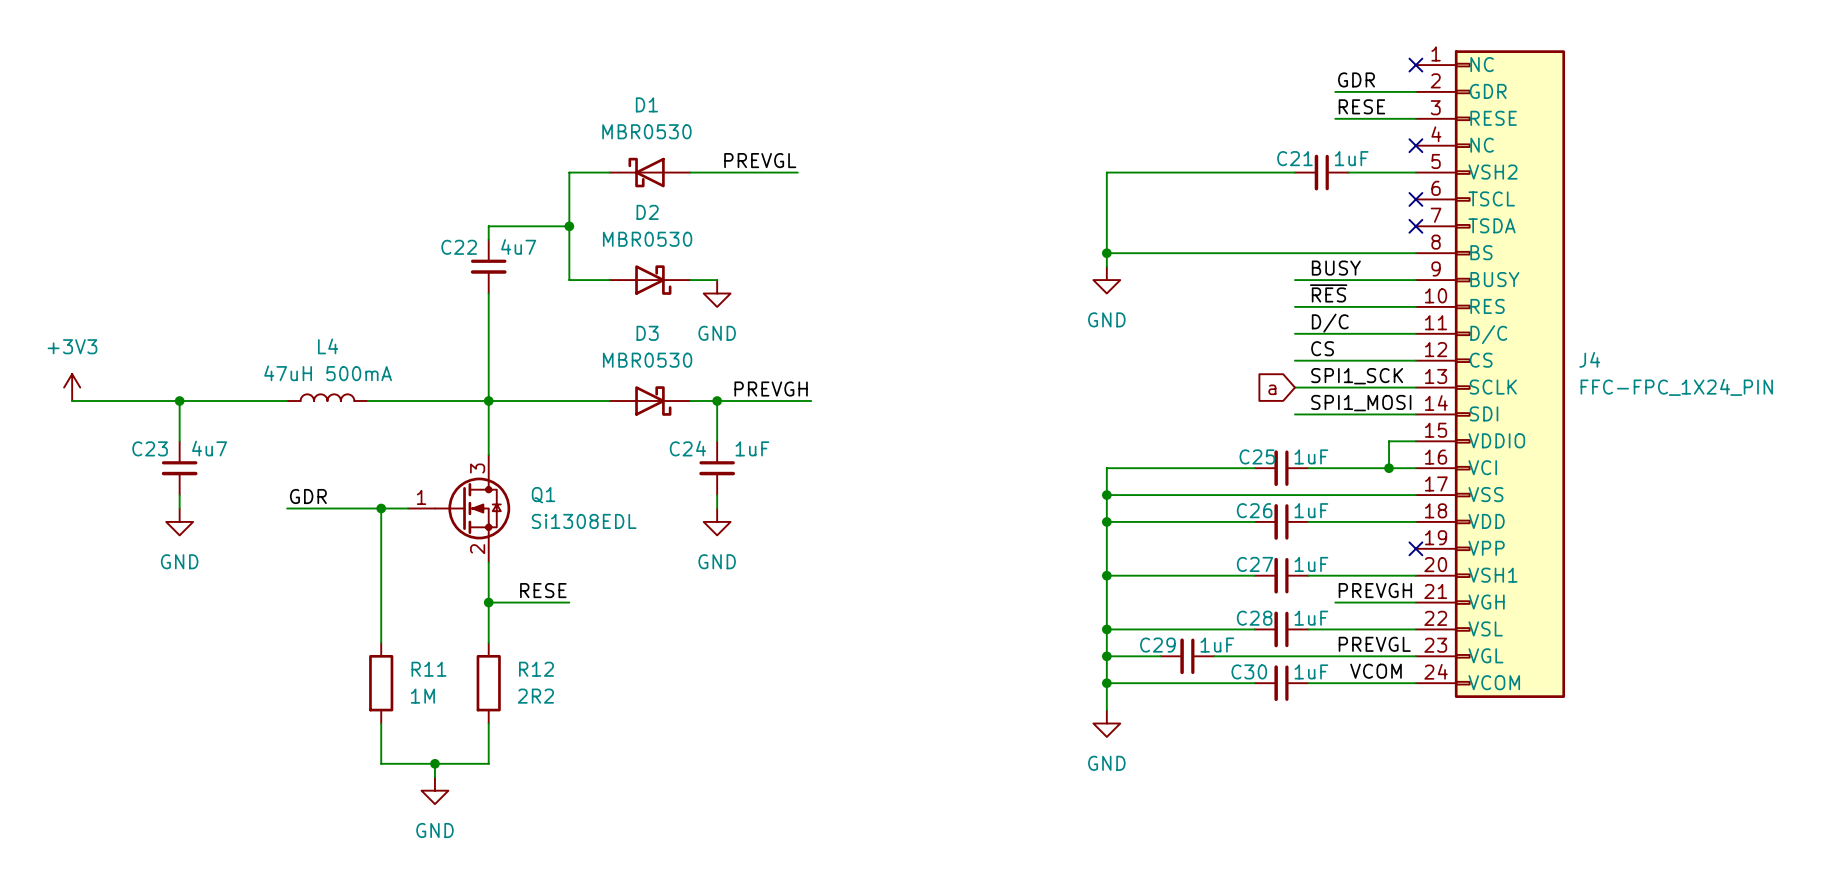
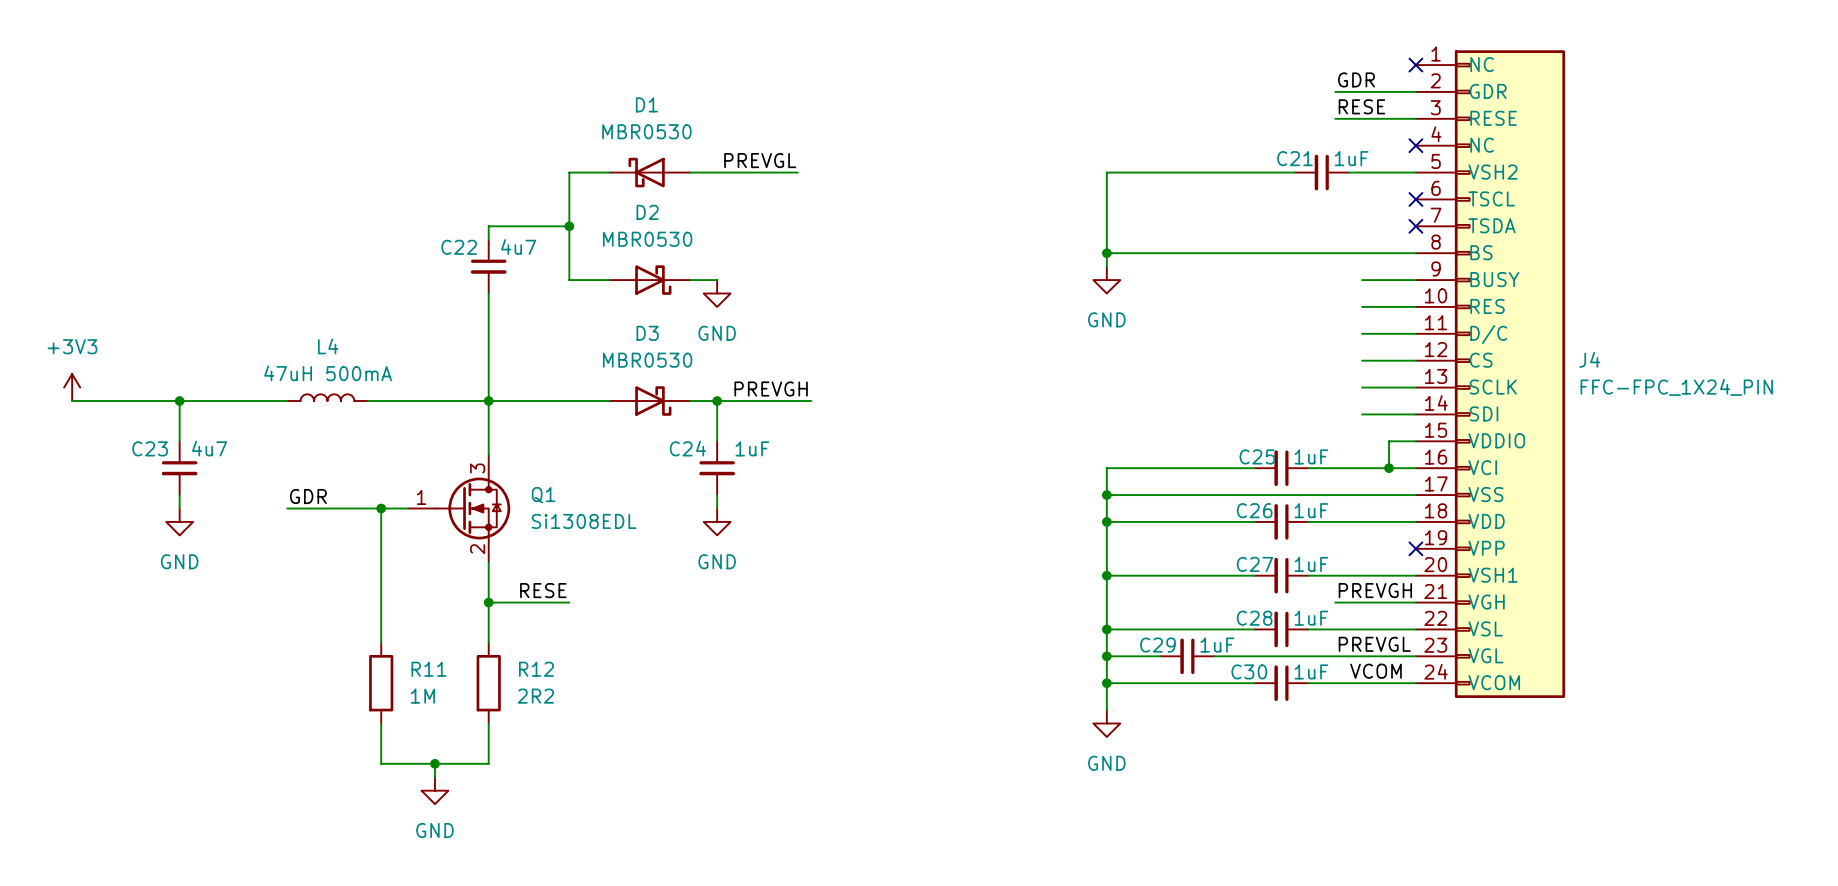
label: BUSY (1336, 268) -> none
wire: (1294, 280) (1362, 280) -> none
label: ~{RES} (1328, 293) -> none
wire: (1294, 306) (1362, 306) -> none
label: D/C (1330, 323) -> none
wire: (1294, 333) (1362, 333) -> none
label: CS (1322, 348) -> none
wire: (1294, 360) (1362, 360) -> none
label: SPI1_SCK (1357, 376) -> none
wire: (1294, 387) (1362, 387) -> none
global label: a (1272, 389) -> none
label: SPI1_MOSI (1361, 403) -> none
wire: (1294, 414) (1362, 414) -> none

